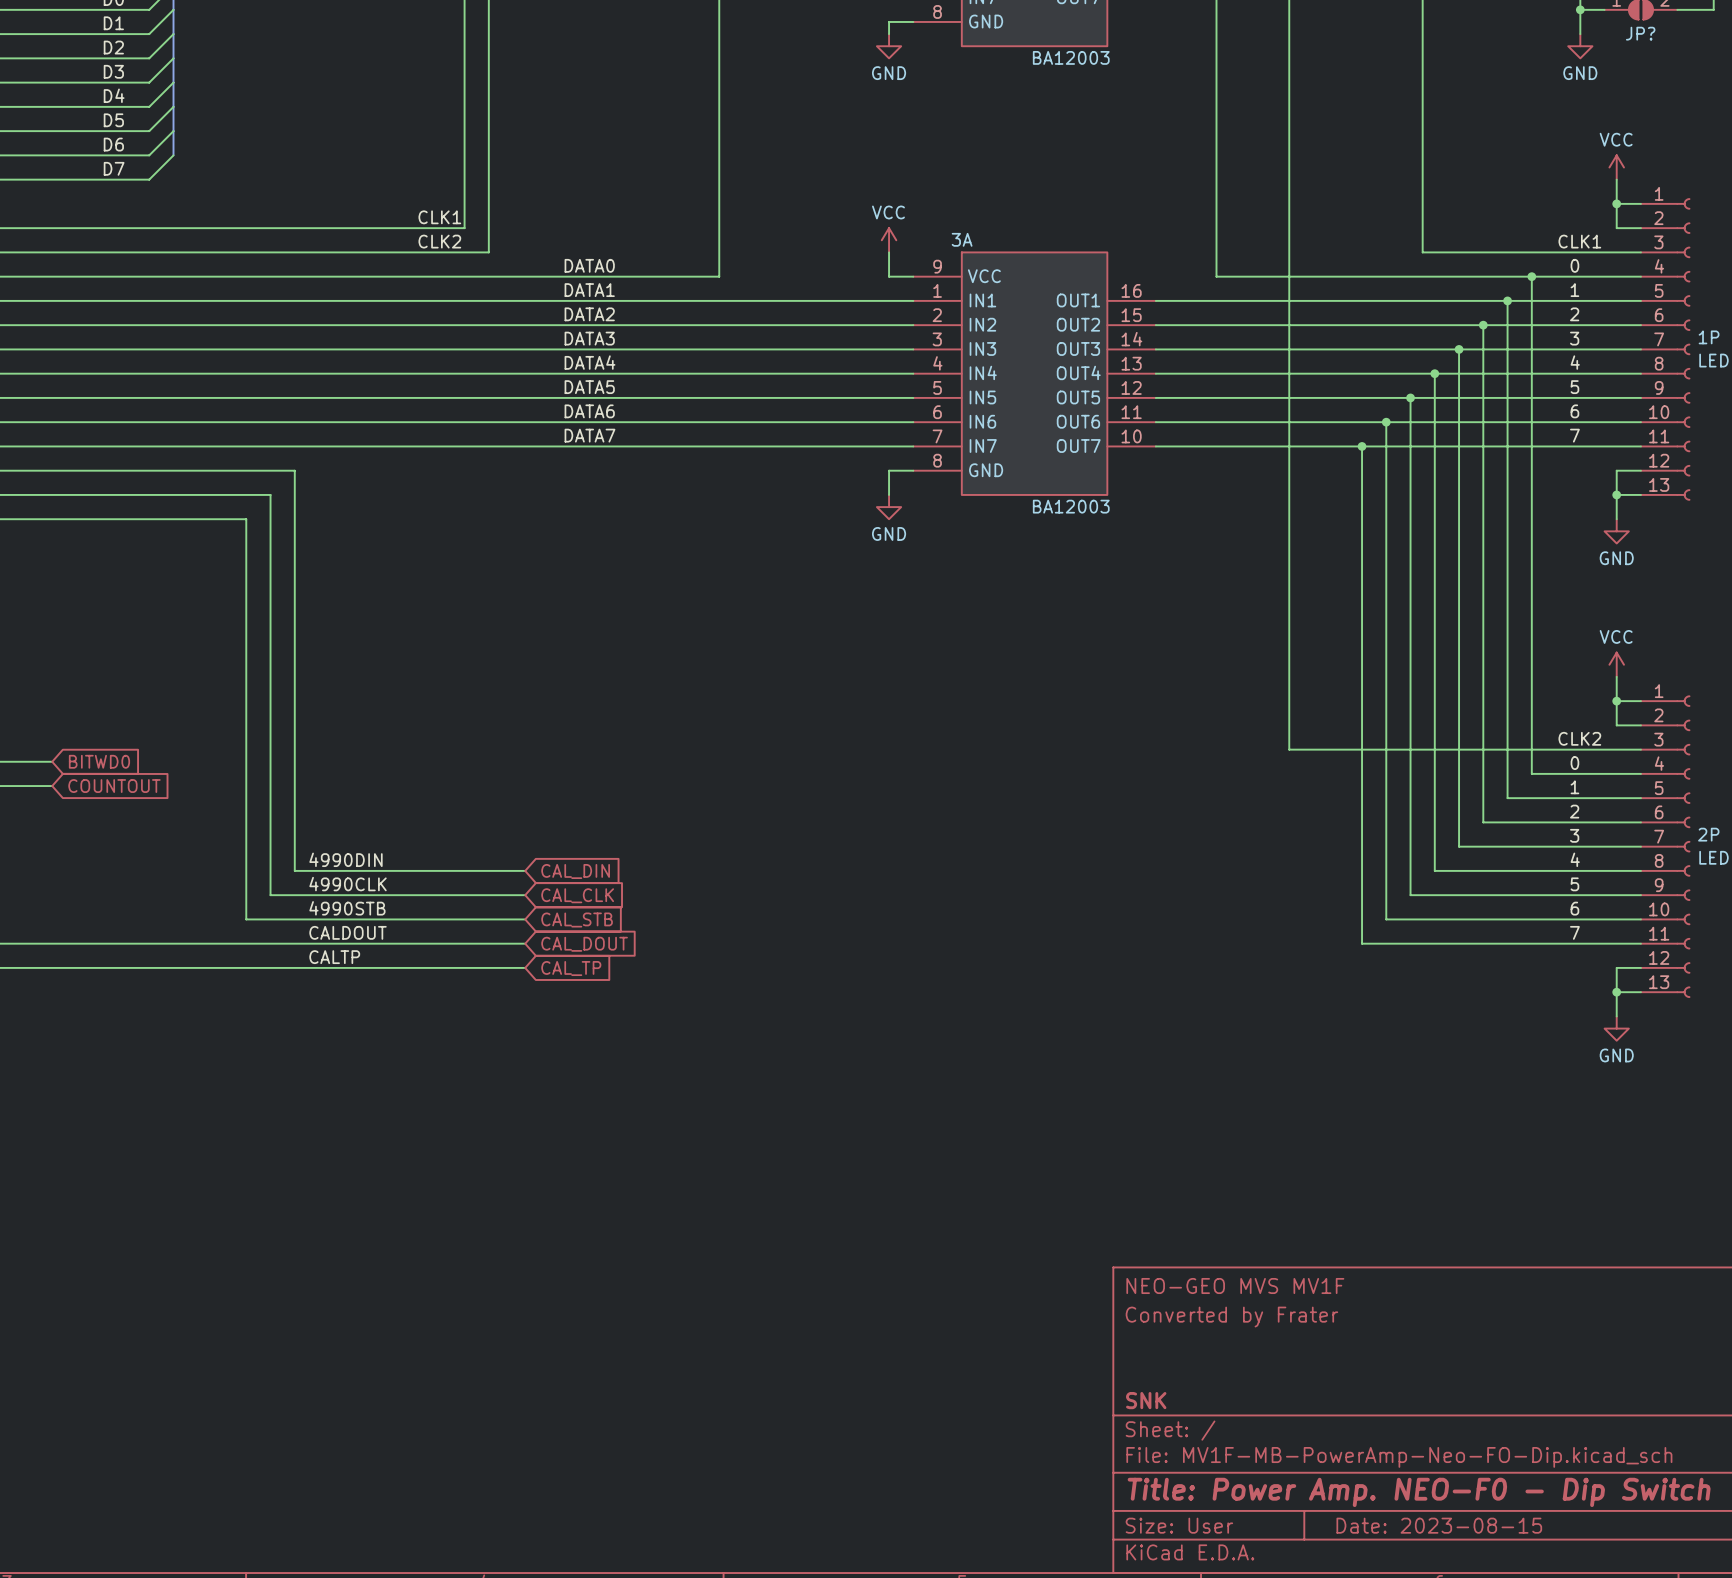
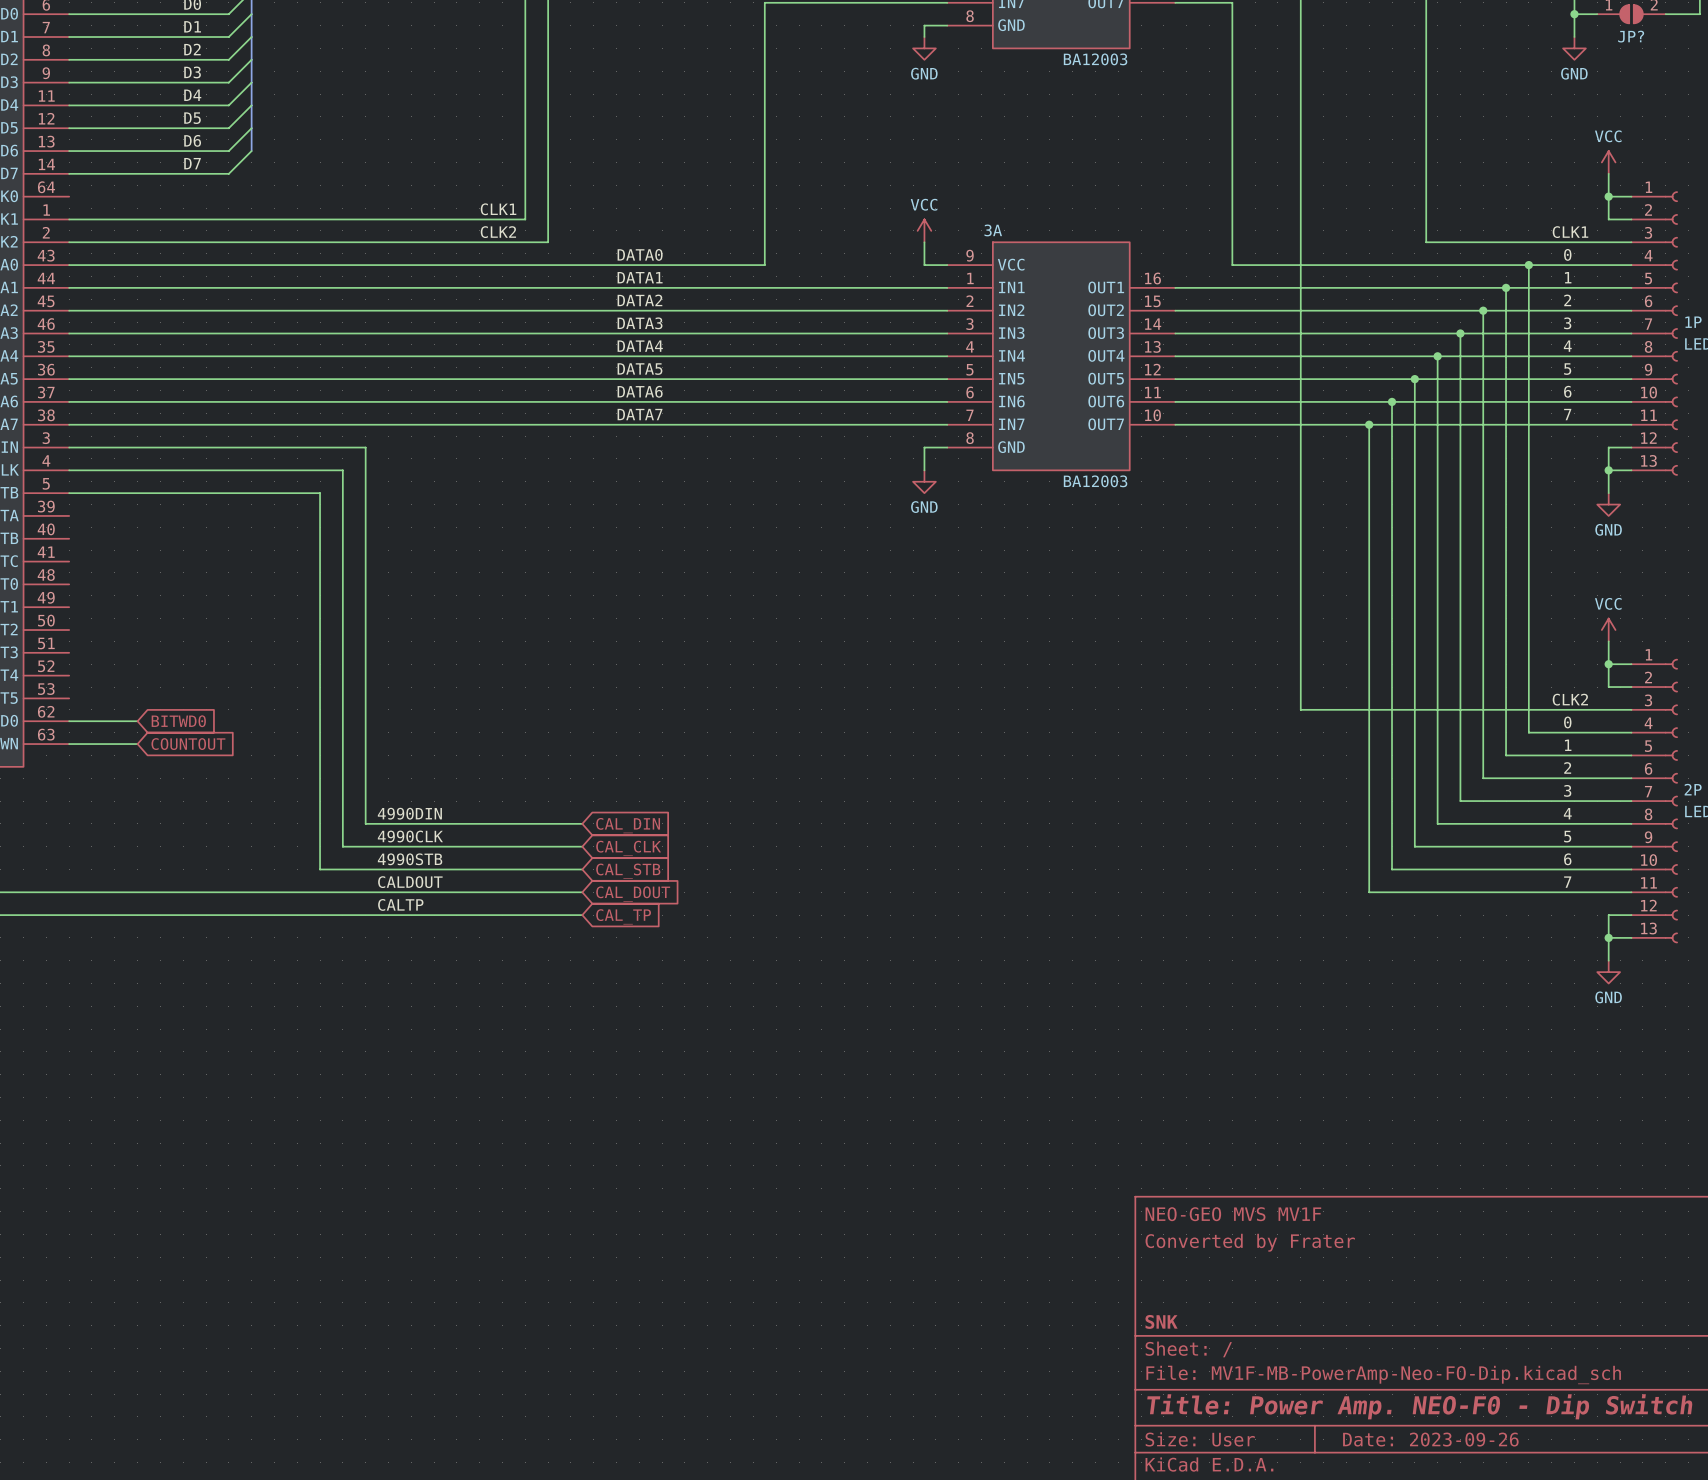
title block: Date: 2023-08-15 (1439, 1525) -> Date: 2023-09-26 (1430, 1439)

